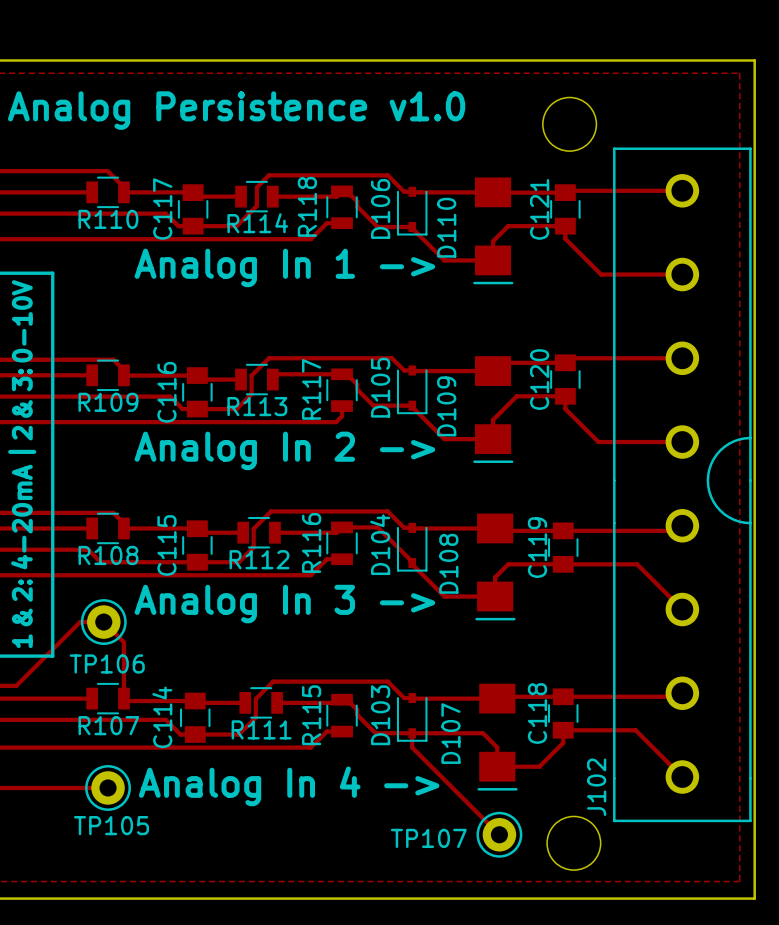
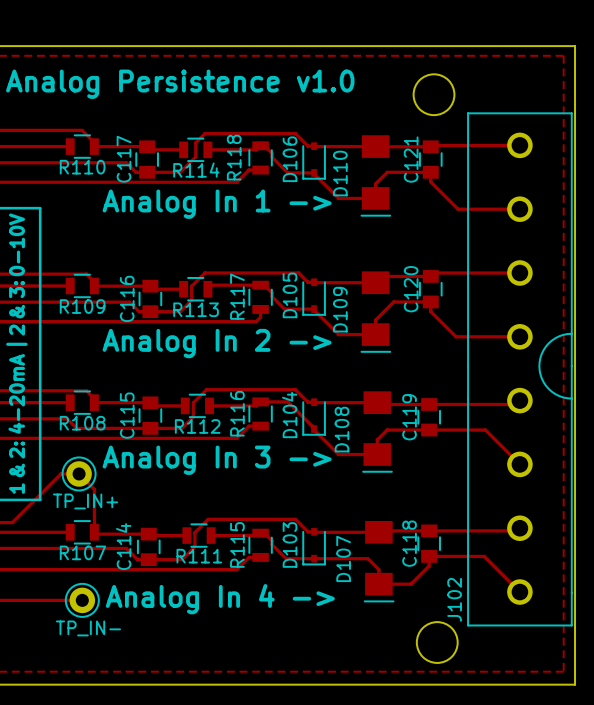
TP106 name: TP106 (107, 663) -> TP_IN+ (85, 501)
track: (412, 733) (412, 747) (499, 834) -> none
TP105 name: TP105 (111, 825) -> TP_IN- (88, 628)
TP107: (499, 834) -> none

